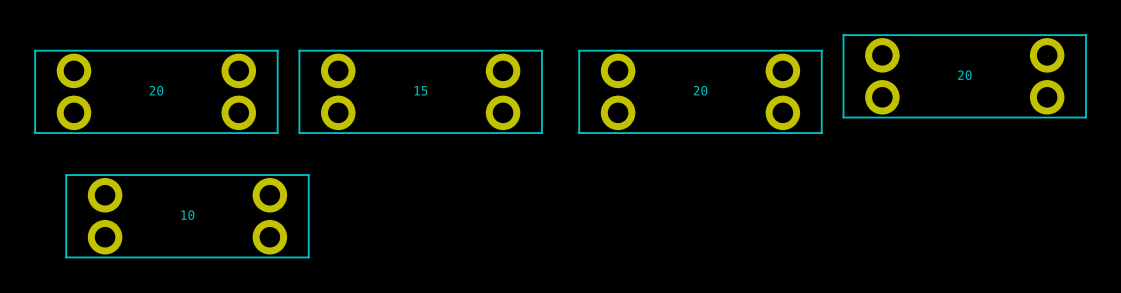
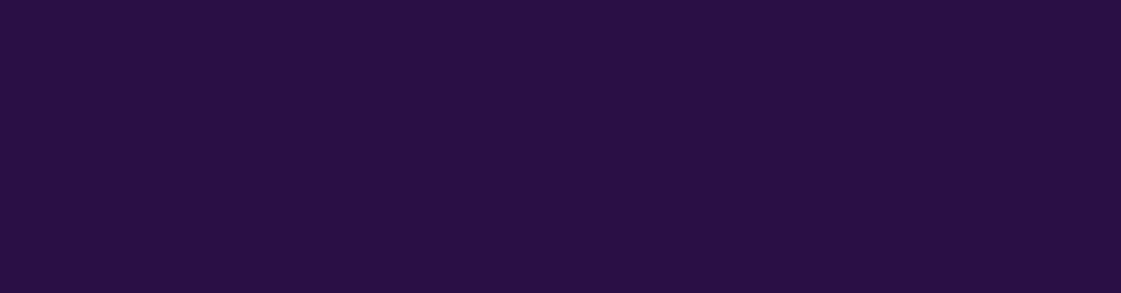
part: 20 (964, 76) -> none
part: 20 (156, 91) -> none
part: 15 (420, 91) -> none
part: 20 (700, 91) -> none
part: 10 (187, 216) -> none

